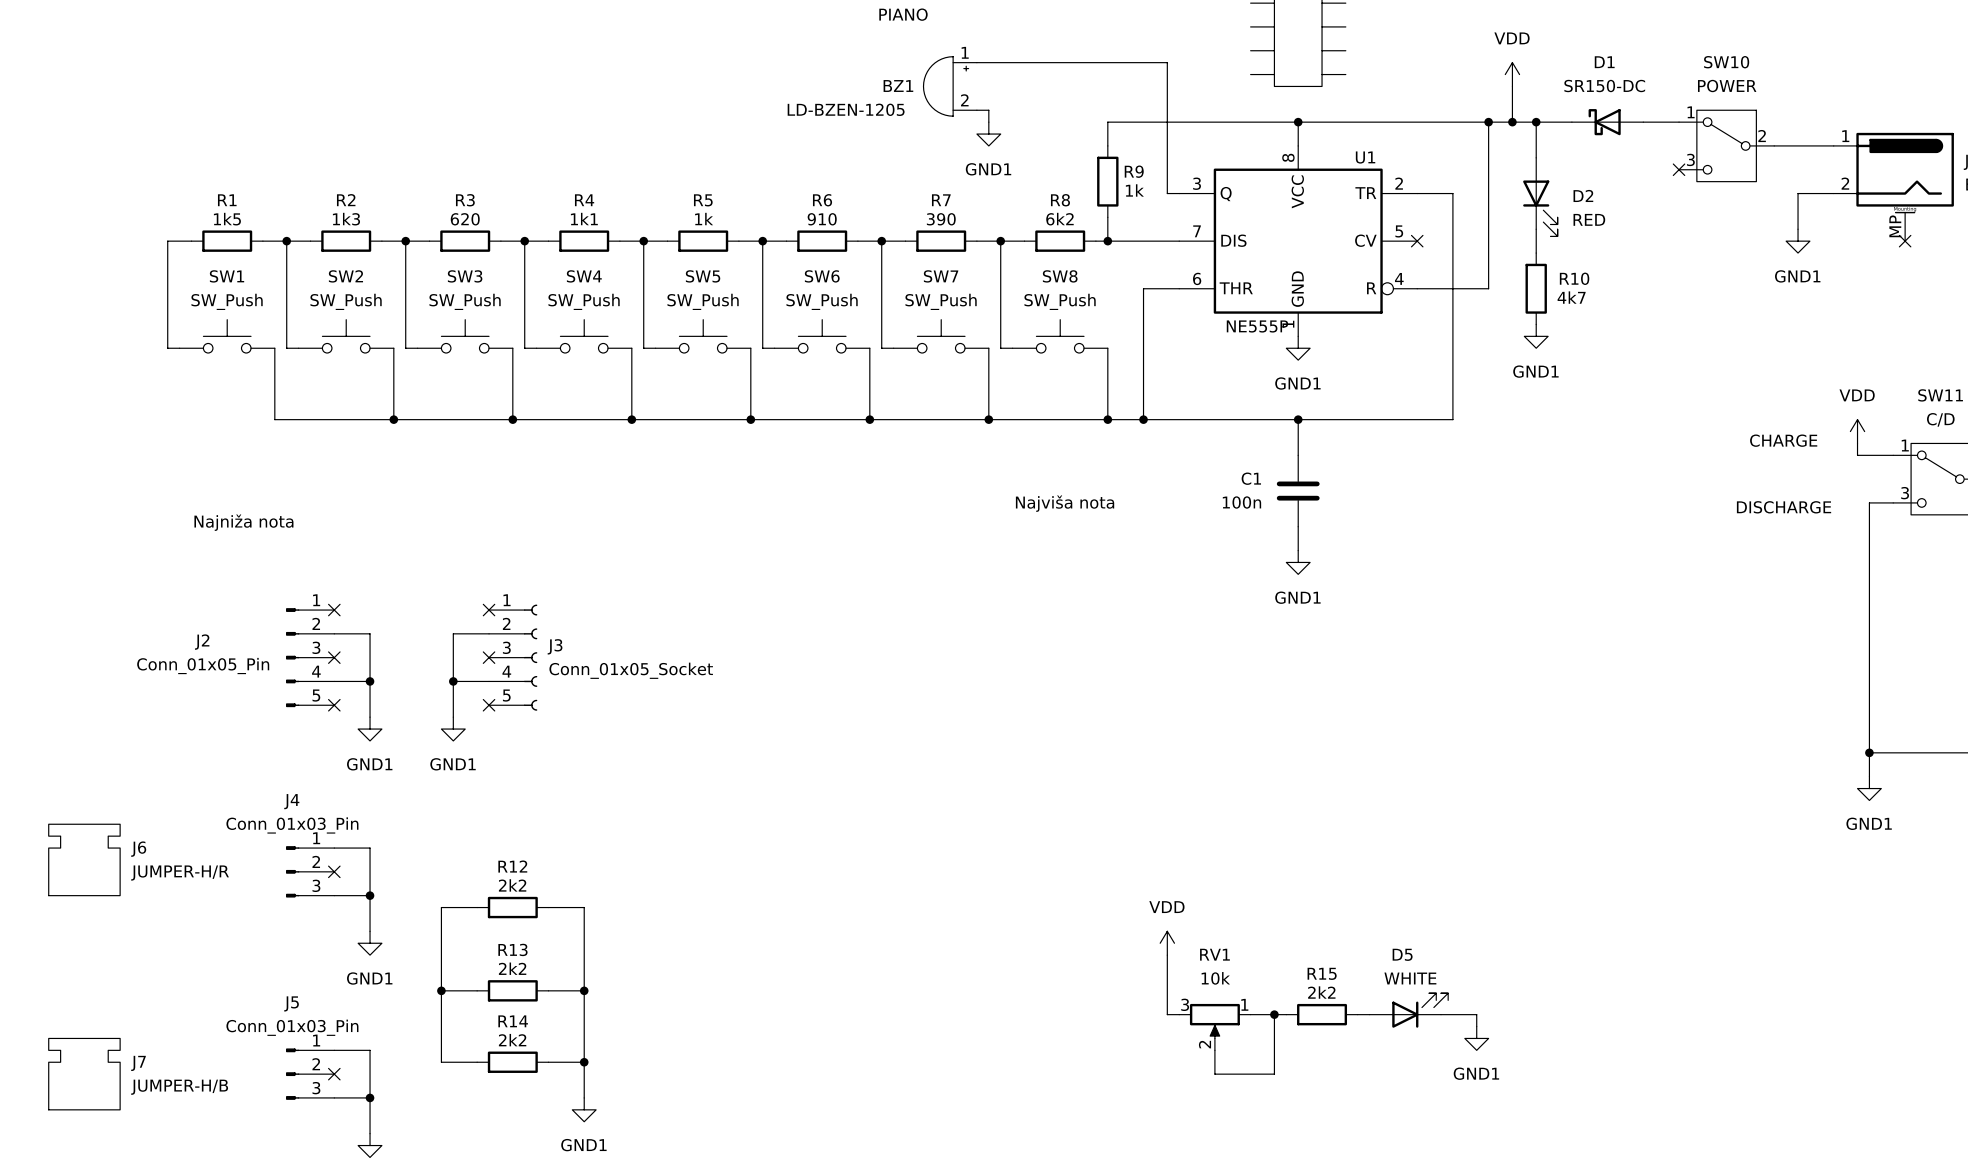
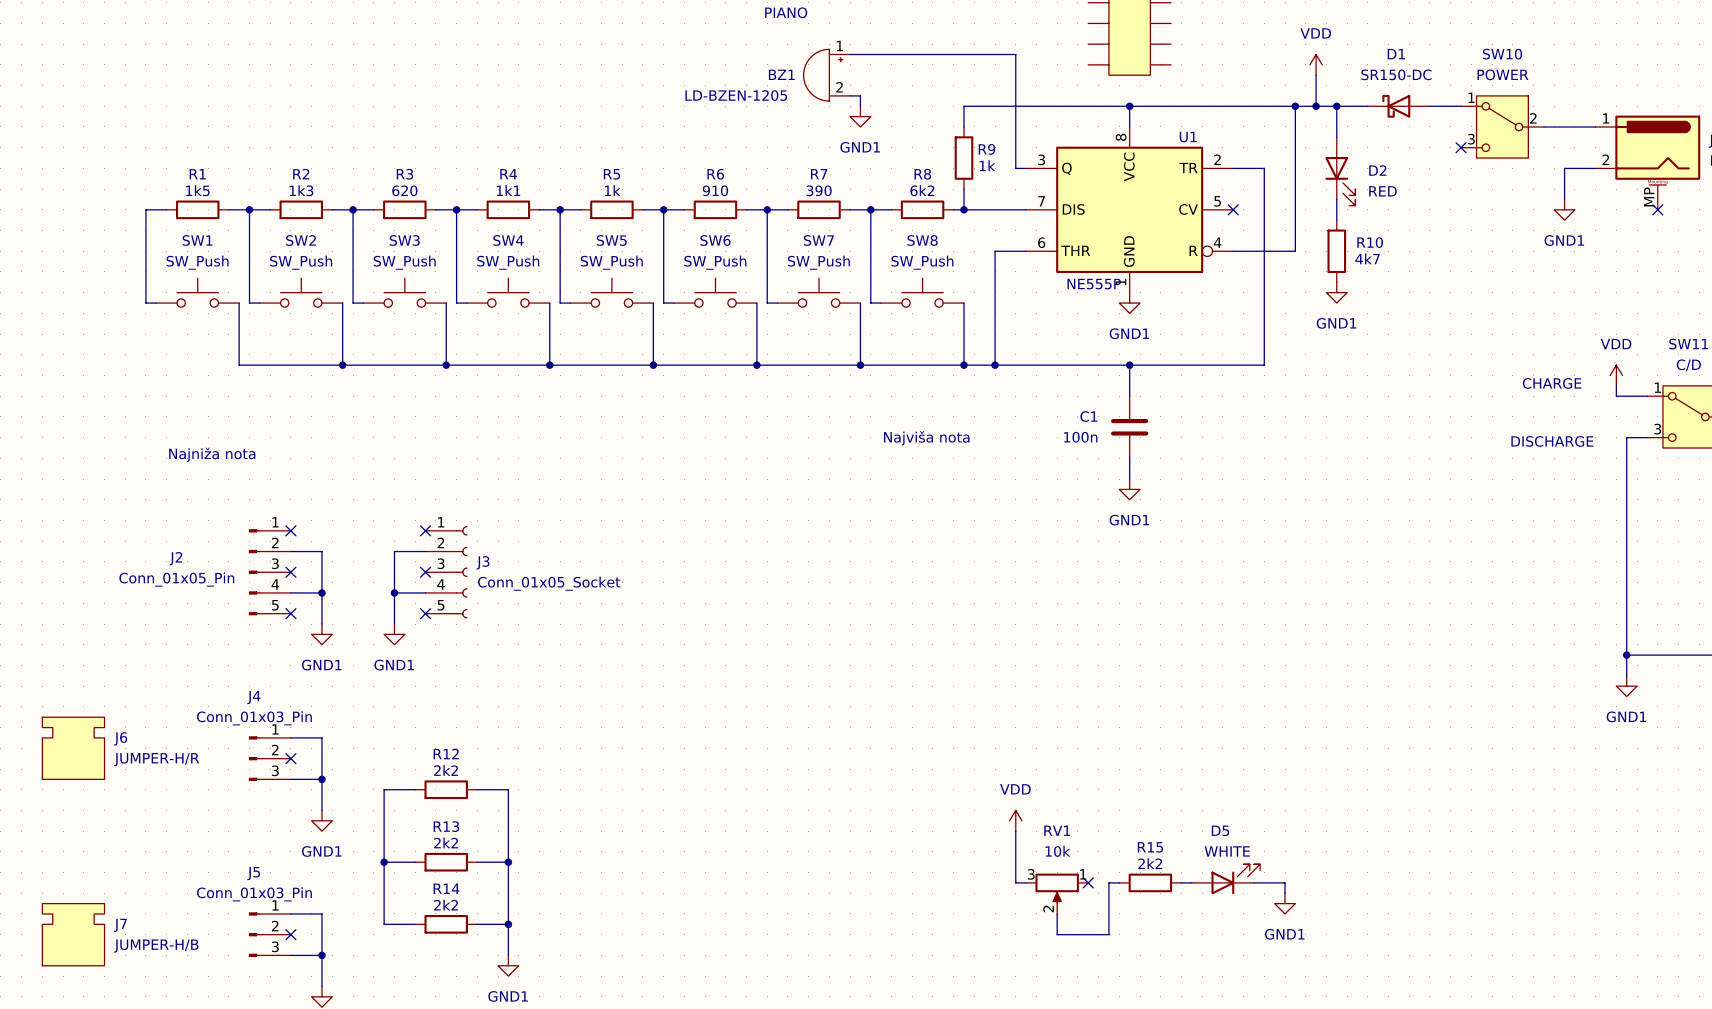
wire: (1250, 1014) (1274, 1014) -> none
no-connect mark: none -> (1088, 882)
junction: (1274, 1014) -> none

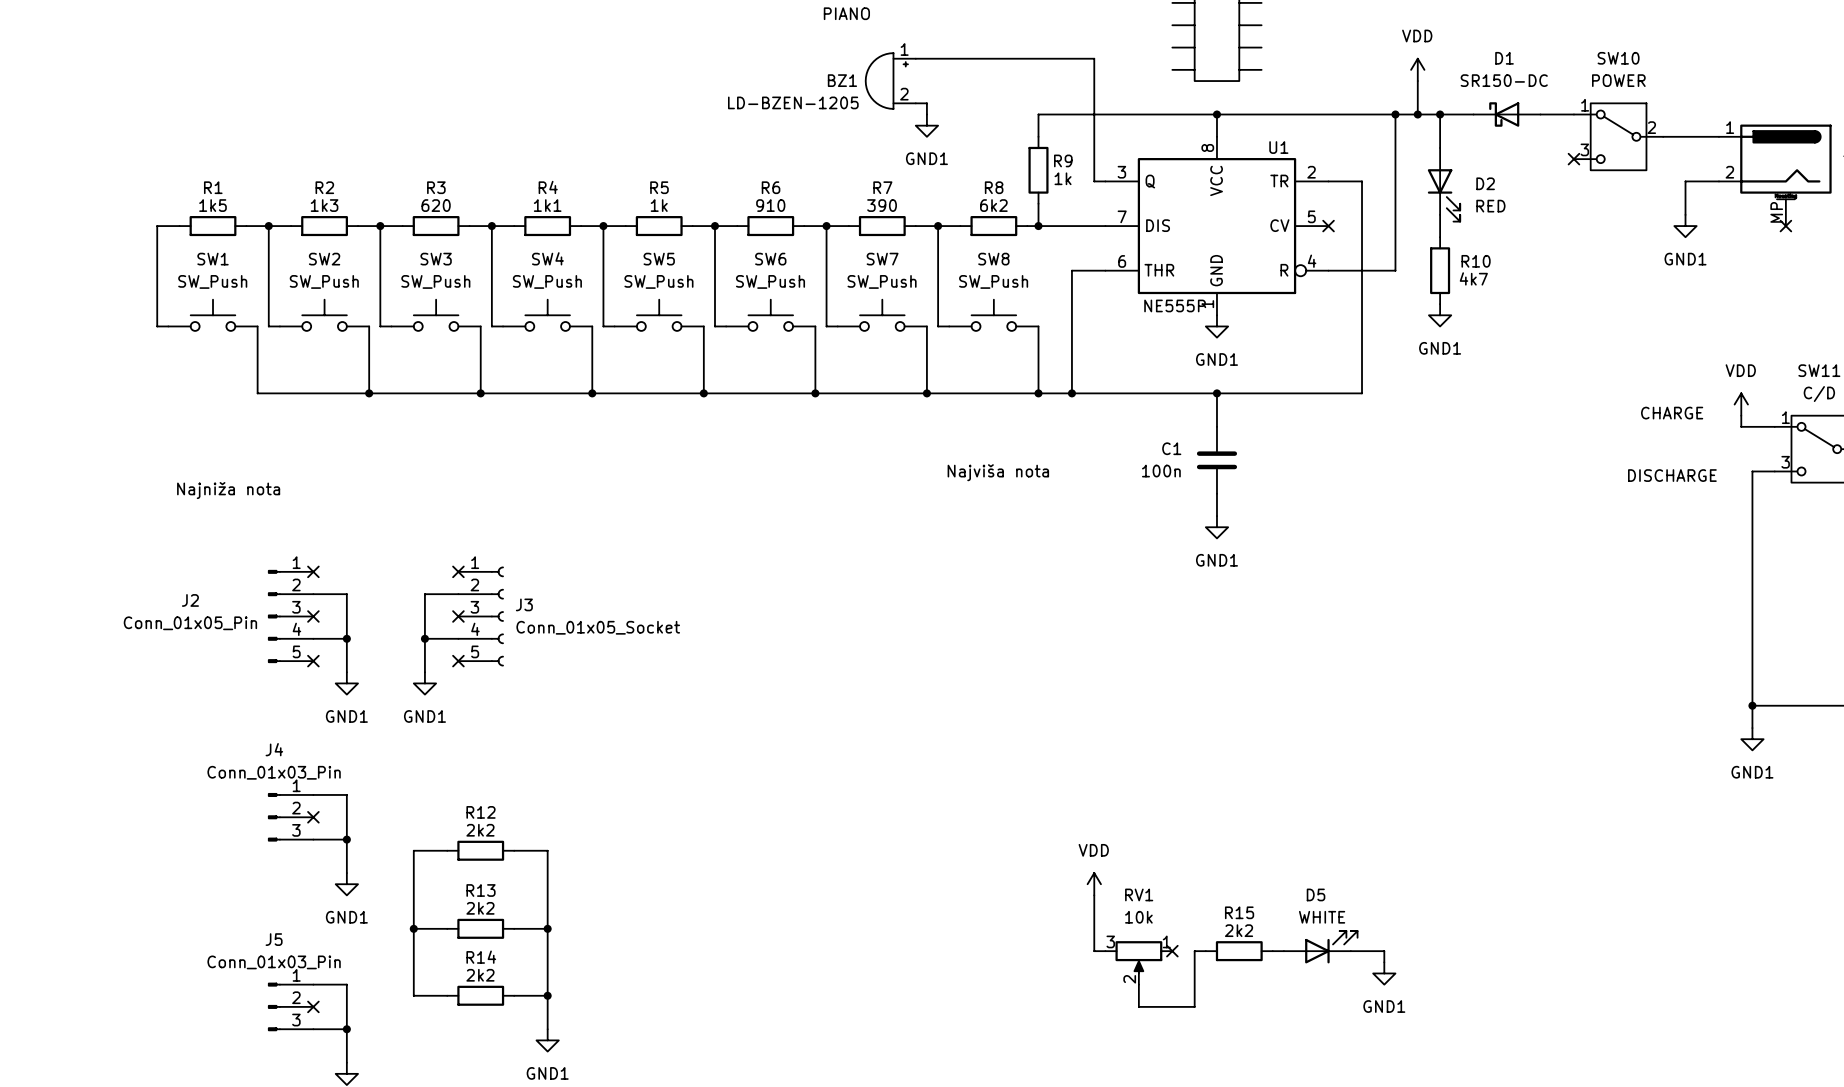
J6: JUMPER-H/R (73, 748) -> none
J7: JUMPER-H/B (73, 934) -> none

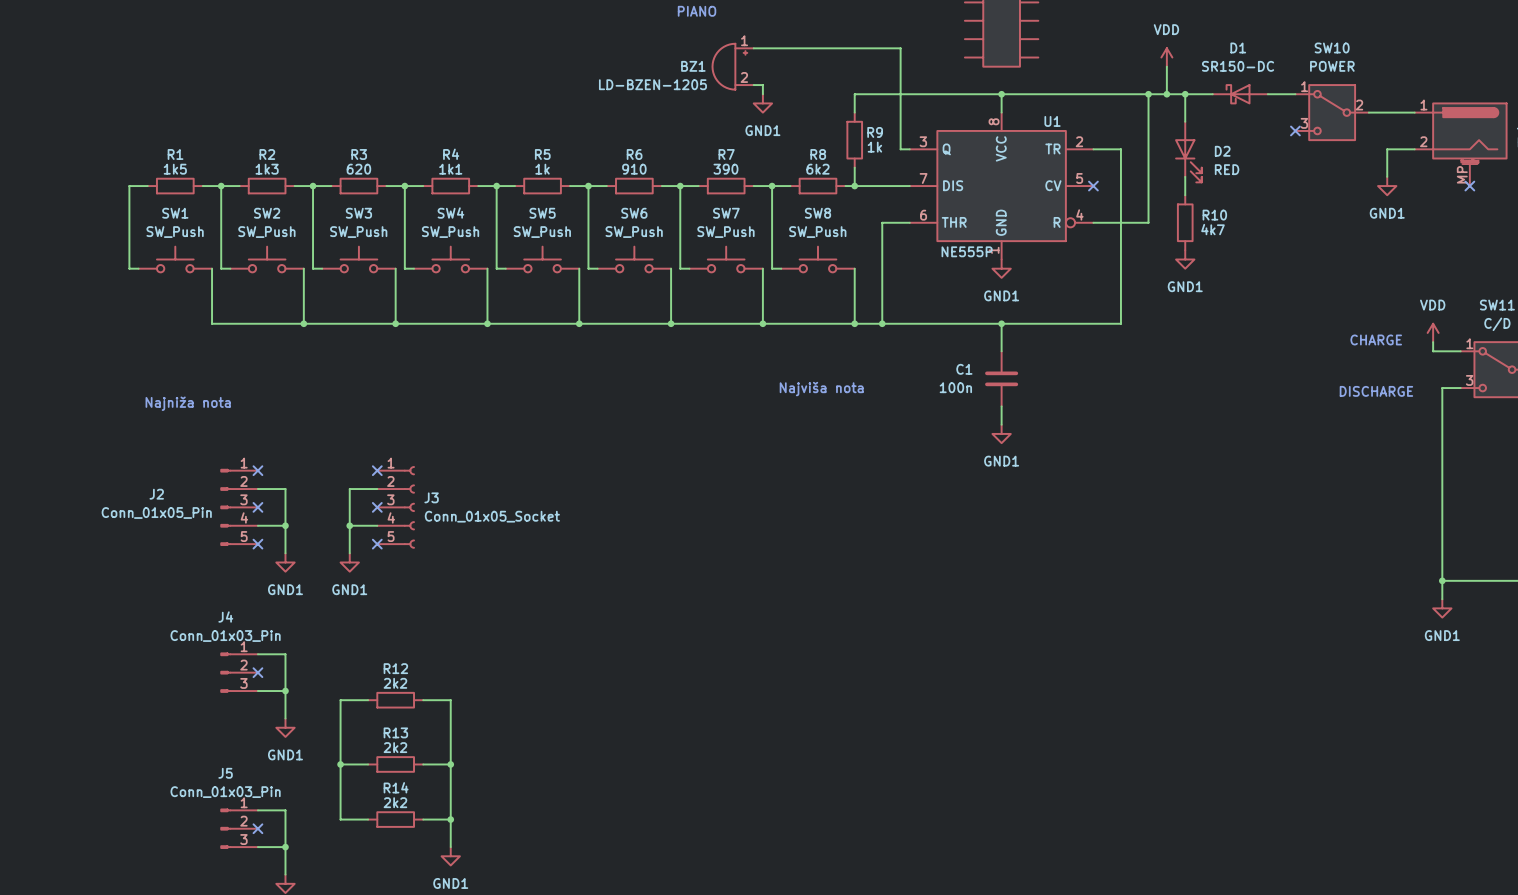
power symbol: VDD (1094, 884) -> none
wire: (1094, 895) (1094, 951) (1105, 951) -> none
D5: WHITE (1320, 947) -> none
no-connect mark: (1172, 951) -> none
wire: (1205, 951) (1194, 951) (1194, 1006) (1138, 1006) (1138, 984) -> none
R15: 2k2 (1239, 951) -> none
wire: (1272, 951) (1283, 951) -> none
wire: (1350, 951) (1384, 951) (1384, 962) -> none
RV1: 10k (1138, 962) -> none
power symbol: GND1 (1384, 973) -> none

